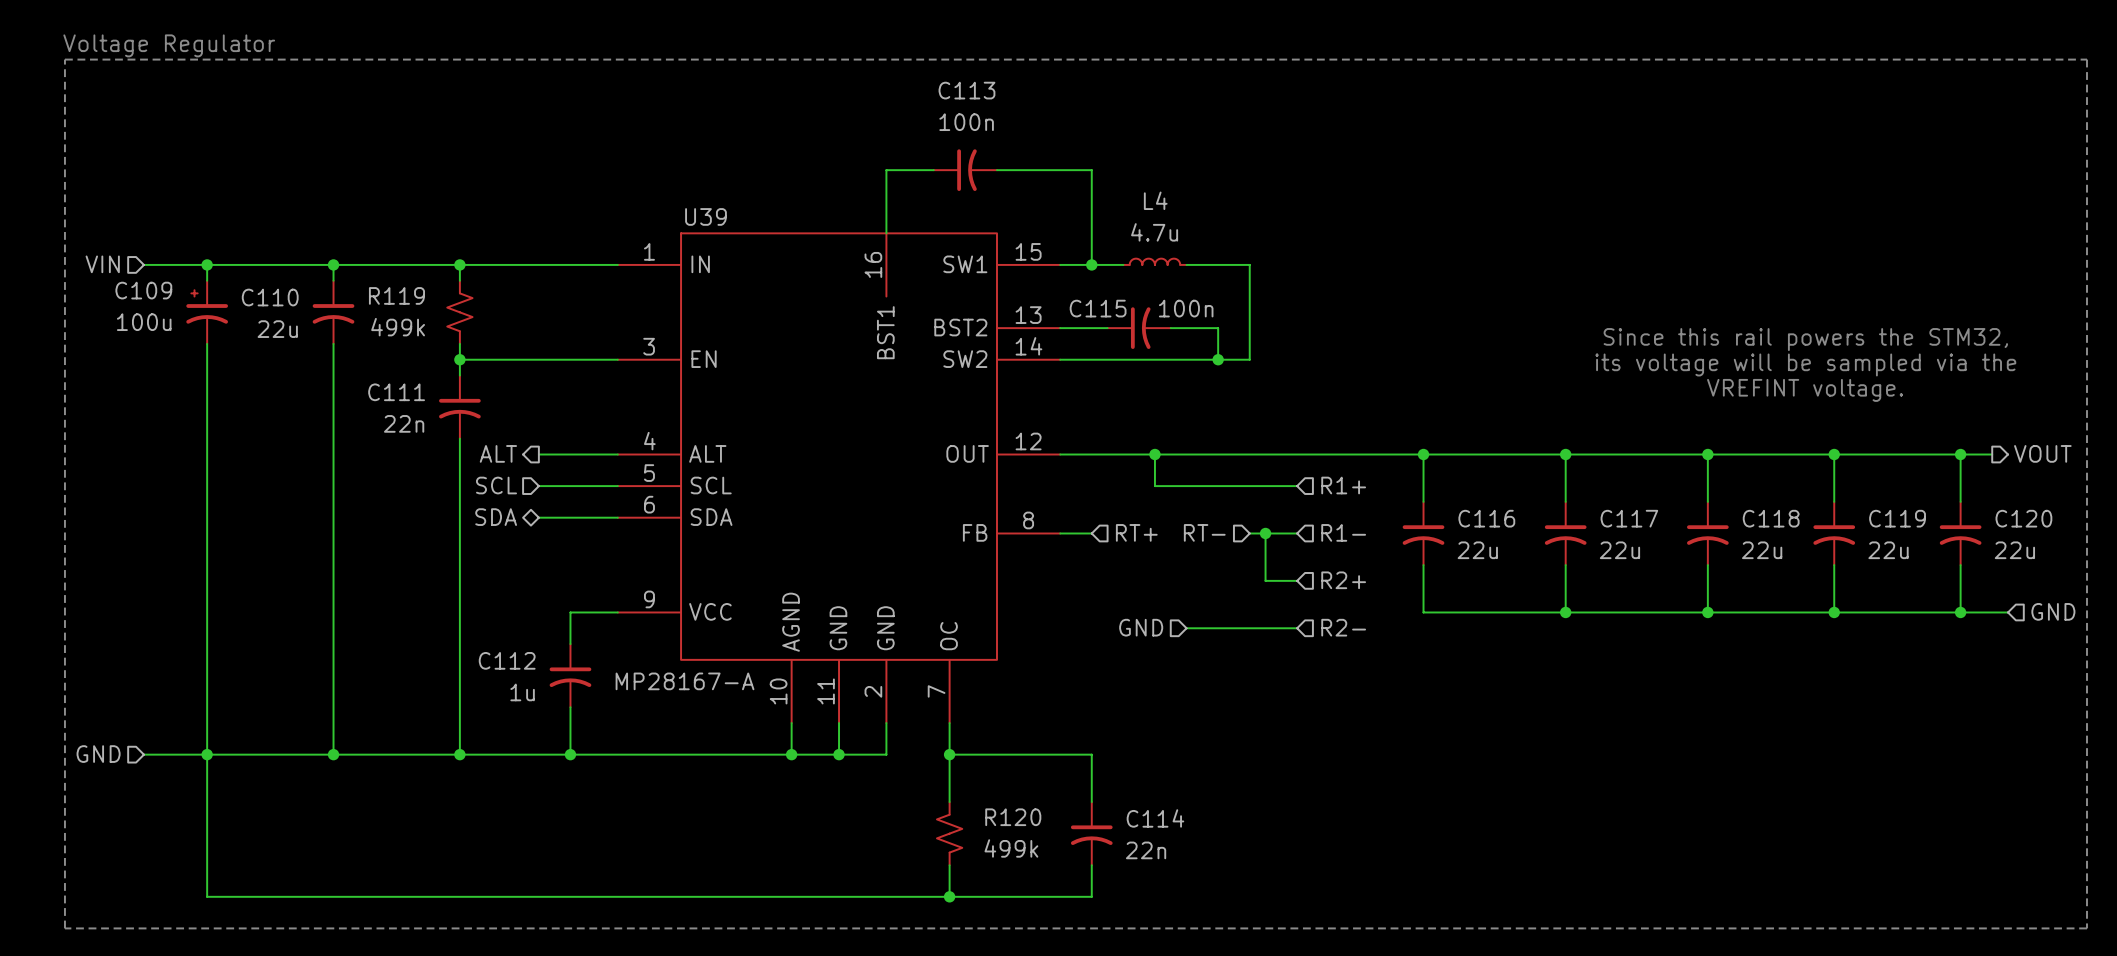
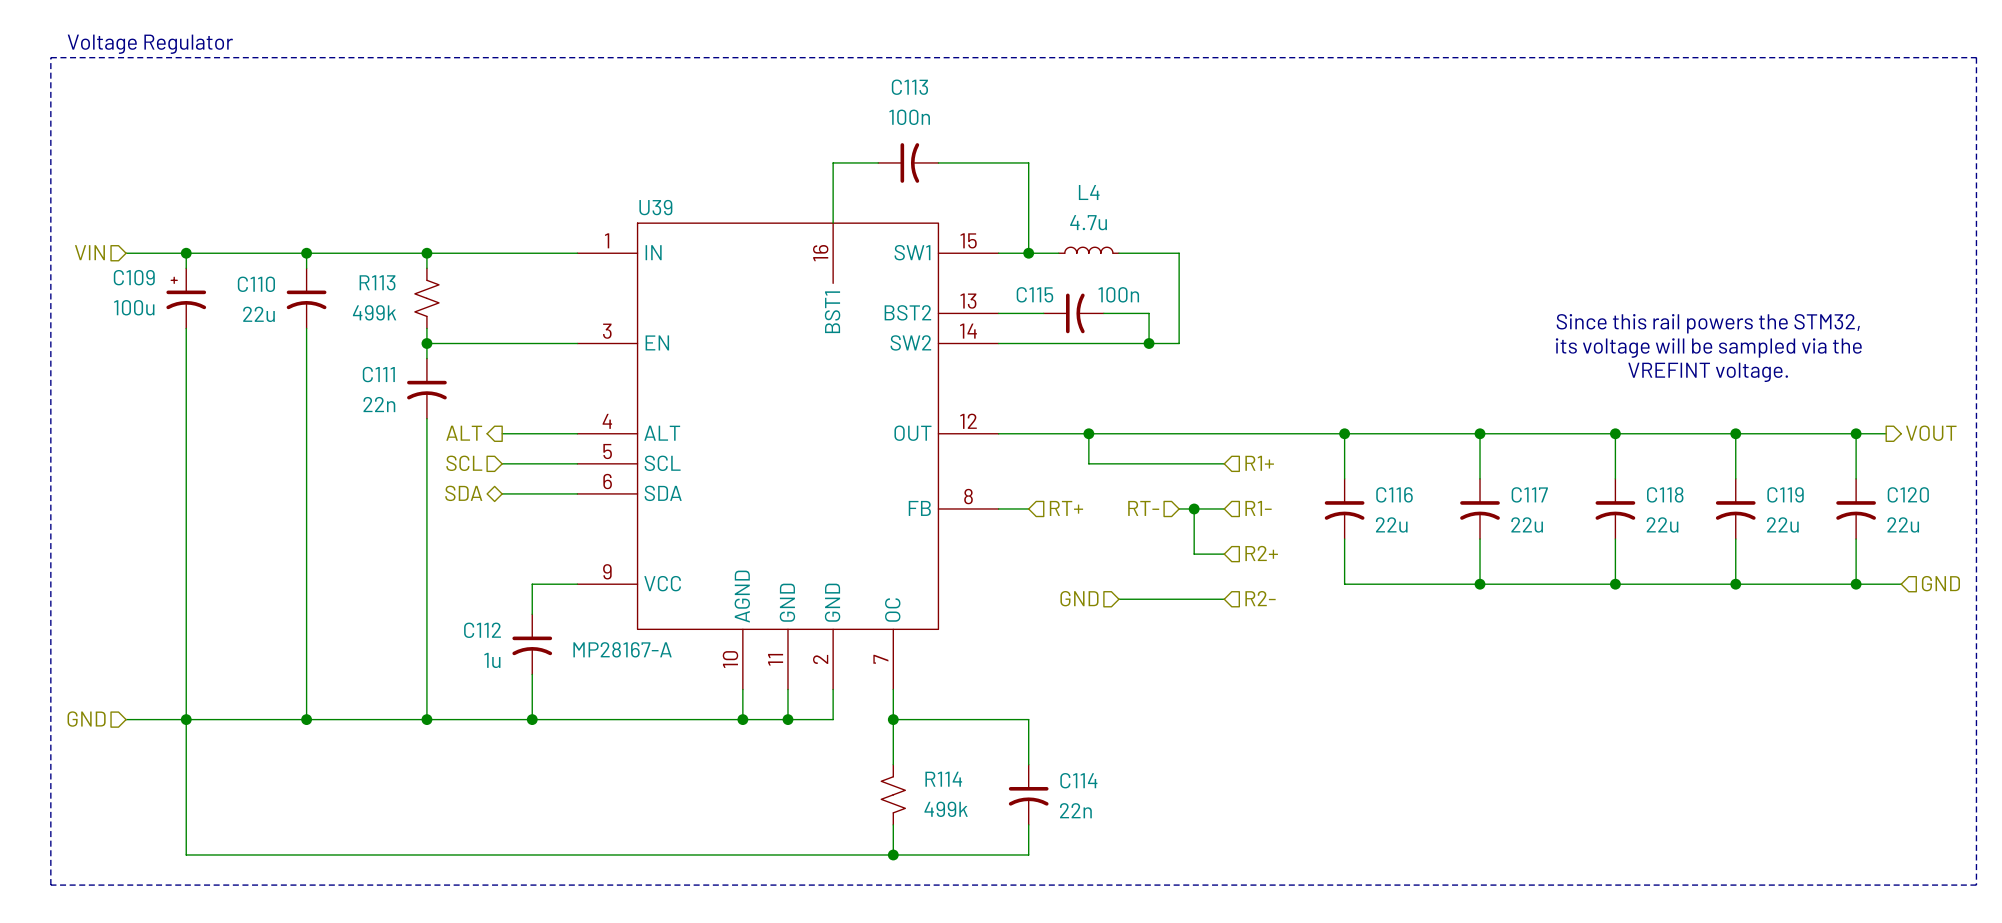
R119 name: R119 (396, 295) -> R113 (377, 282)
R120 name: R120 (1013, 817) -> R114 (943, 779)

